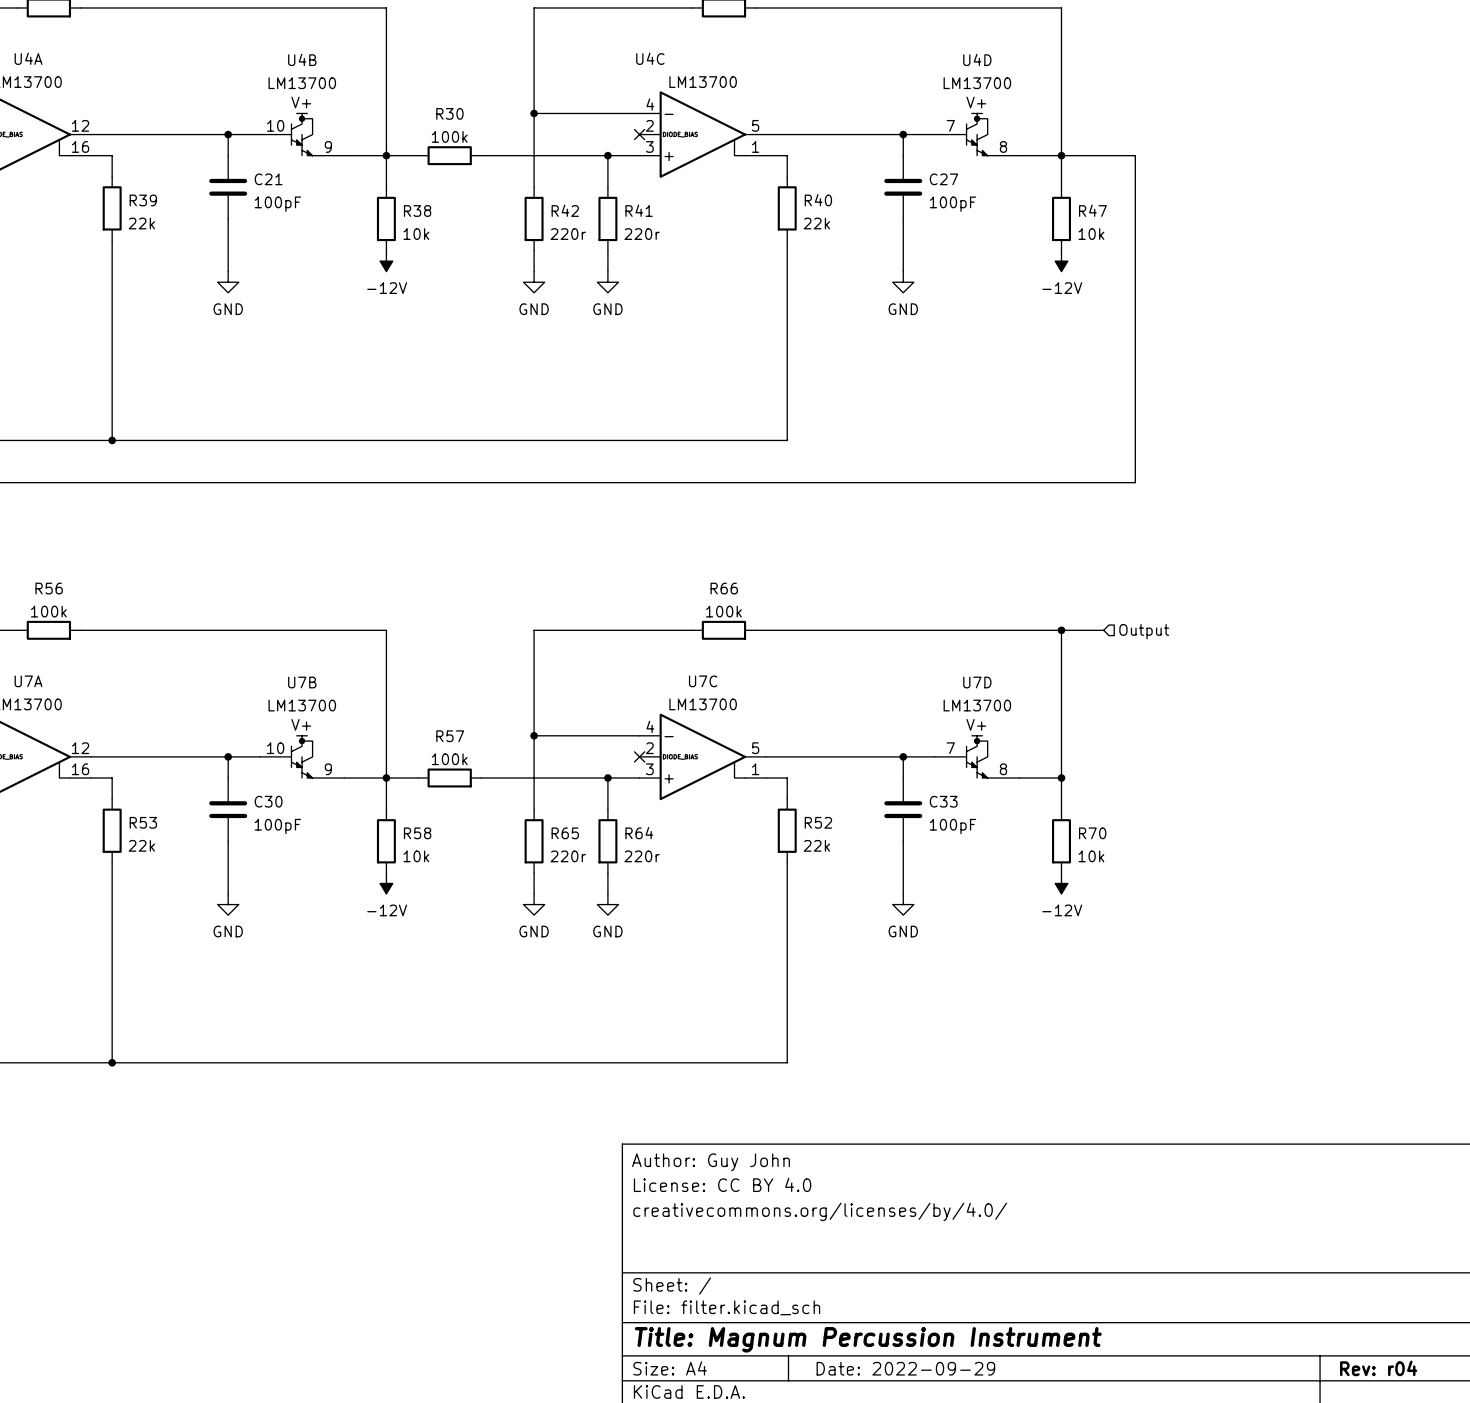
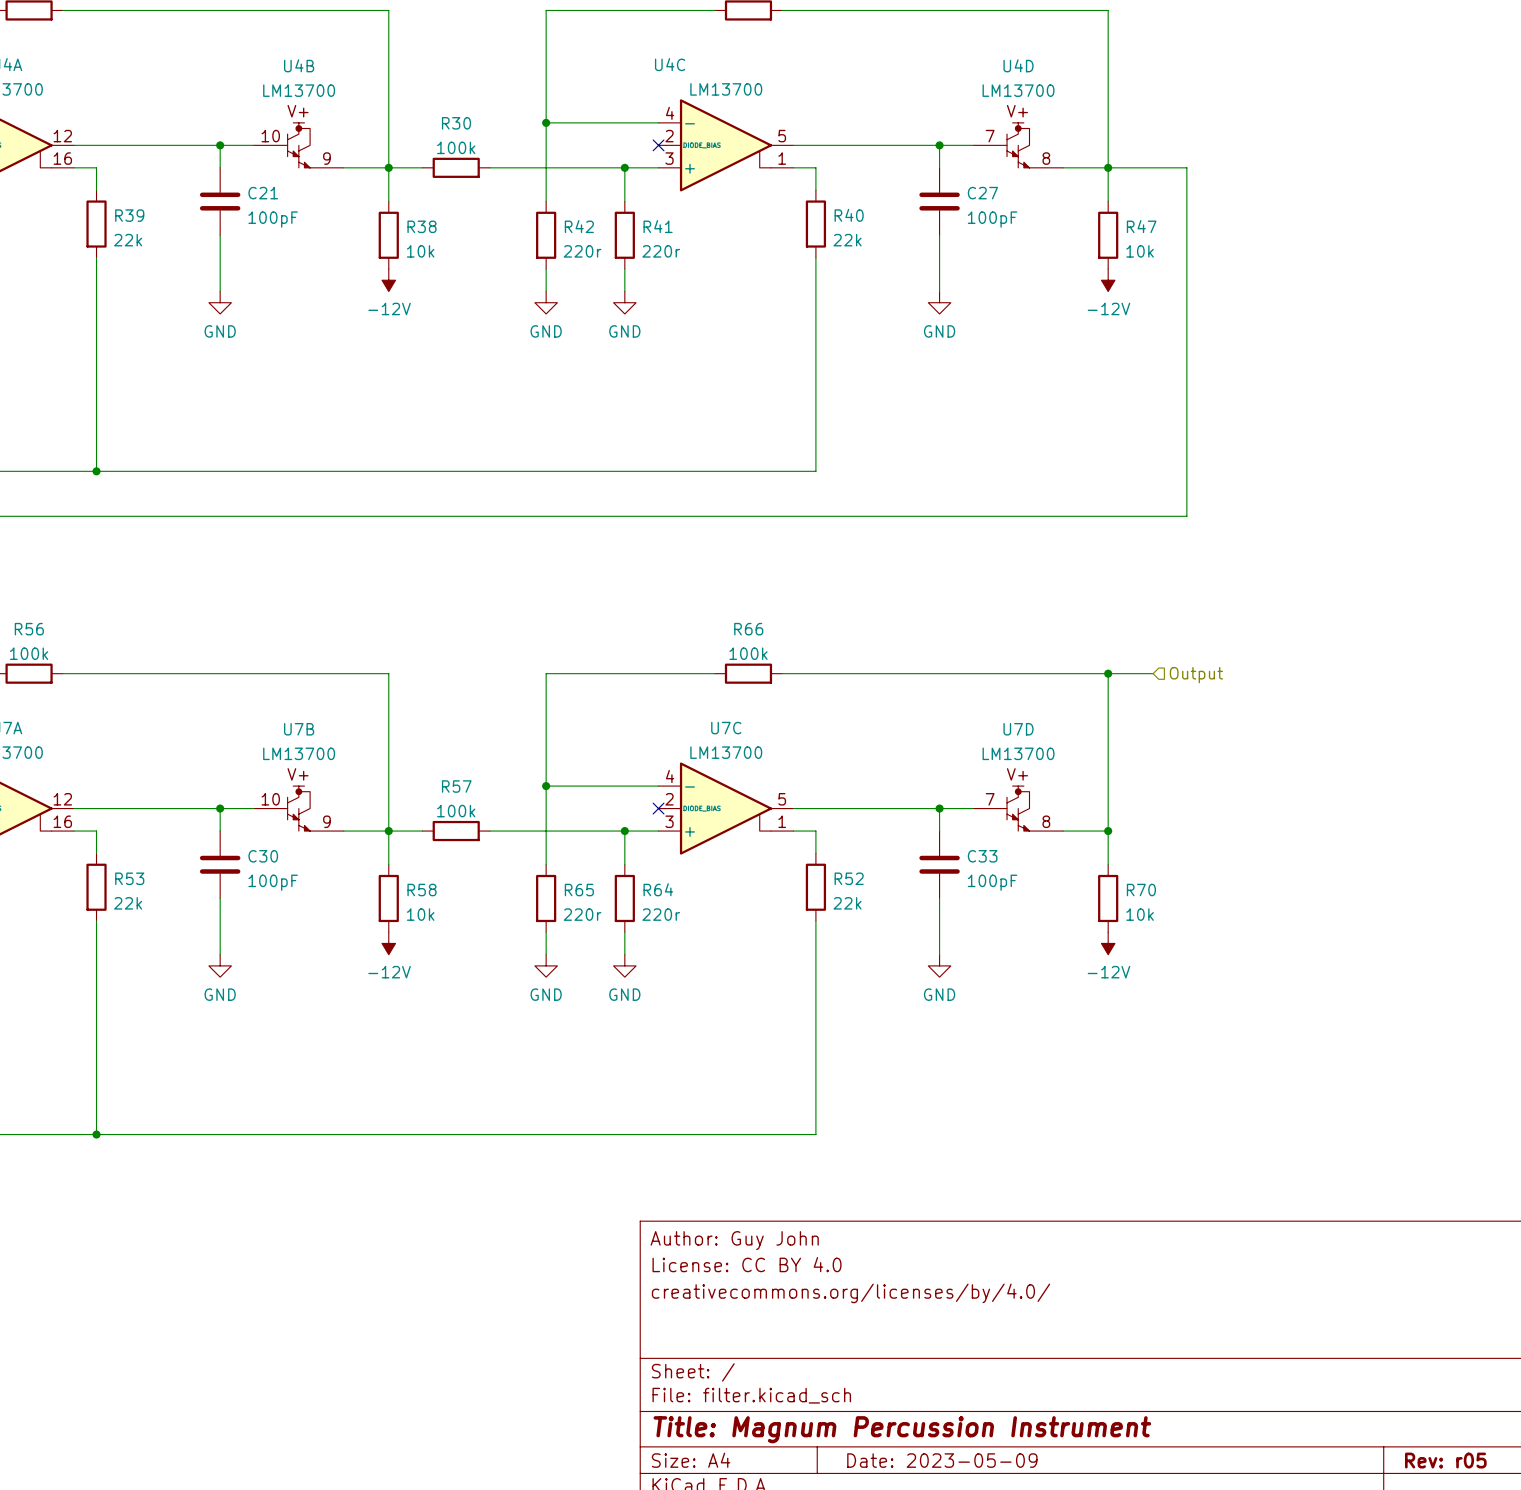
title block: Date: 2022-09-29 (905, 1368) -> Date: 2023-05-09 (942, 1460)
title block: Rev: r04 (1378, 1368) -> Rev: r05 (1445, 1460)

